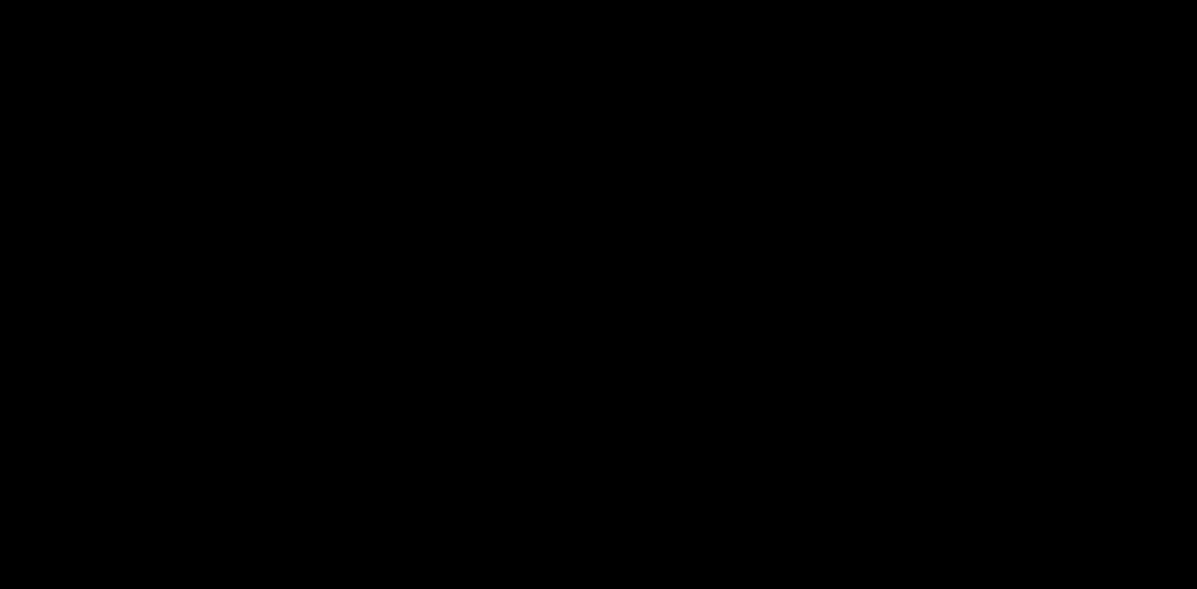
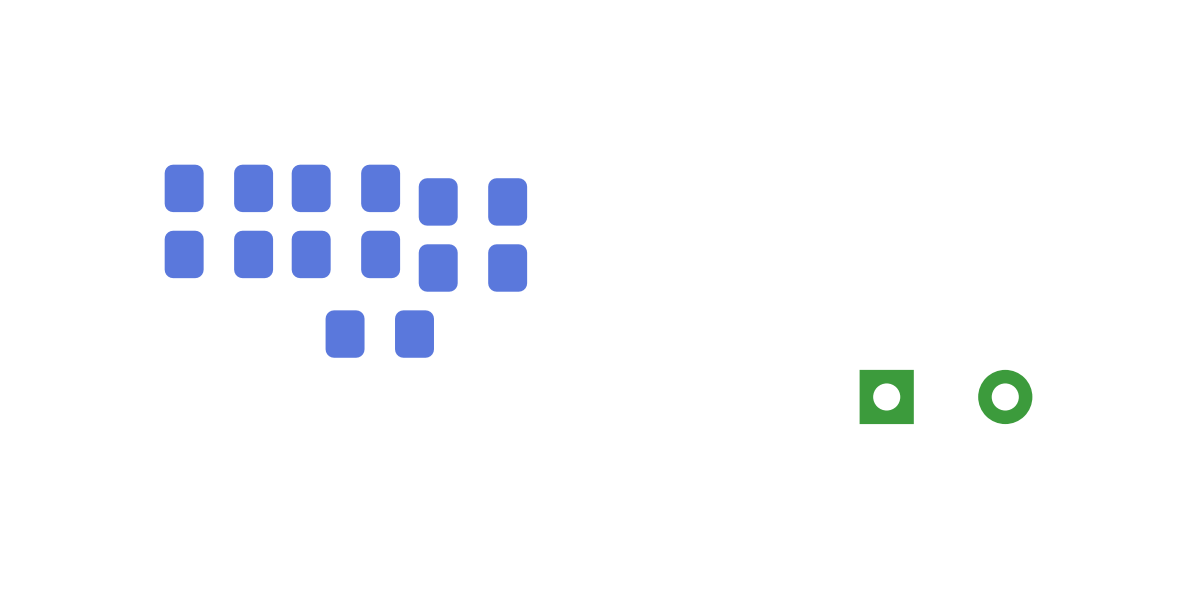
part: none -> (218, 188)
part: none -> (345, 188)
part: none -> (472, 201)
part: none -> (218, 254)
part: none -> (345, 254)
part: none -> (472, 267)
part: none -> (379, 334)
part: none -> (945, 396)

